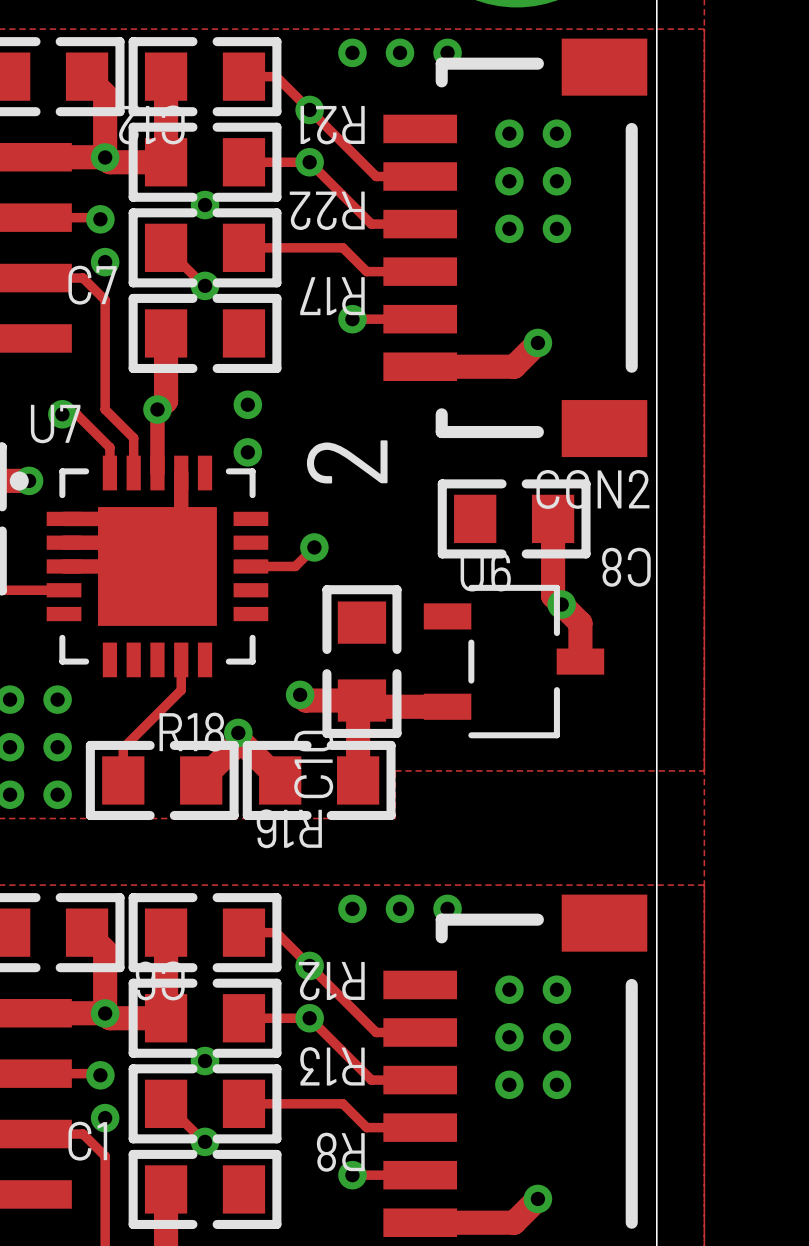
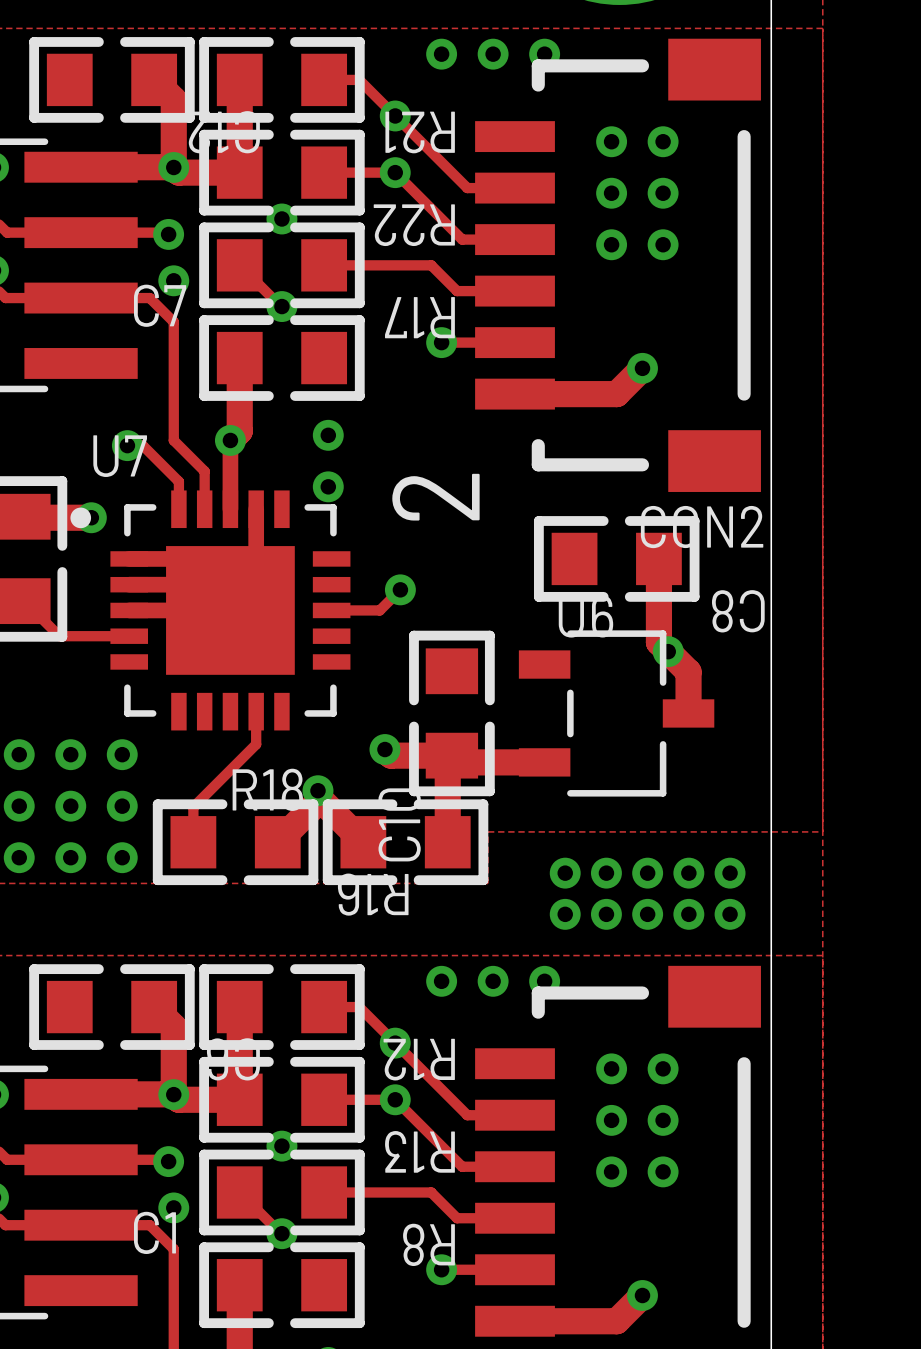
via: none -> (565, 873)
via: none -> (606, 873)
via: none -> (647, 873)
via: none -> (688, 873)
via: none -> (730, 873)
via: none -> (565, 914)
via: none -> (606, 914)
via: none -> (647, 914)
via: none -> (688, 914)
via: none -> (730, 914)

